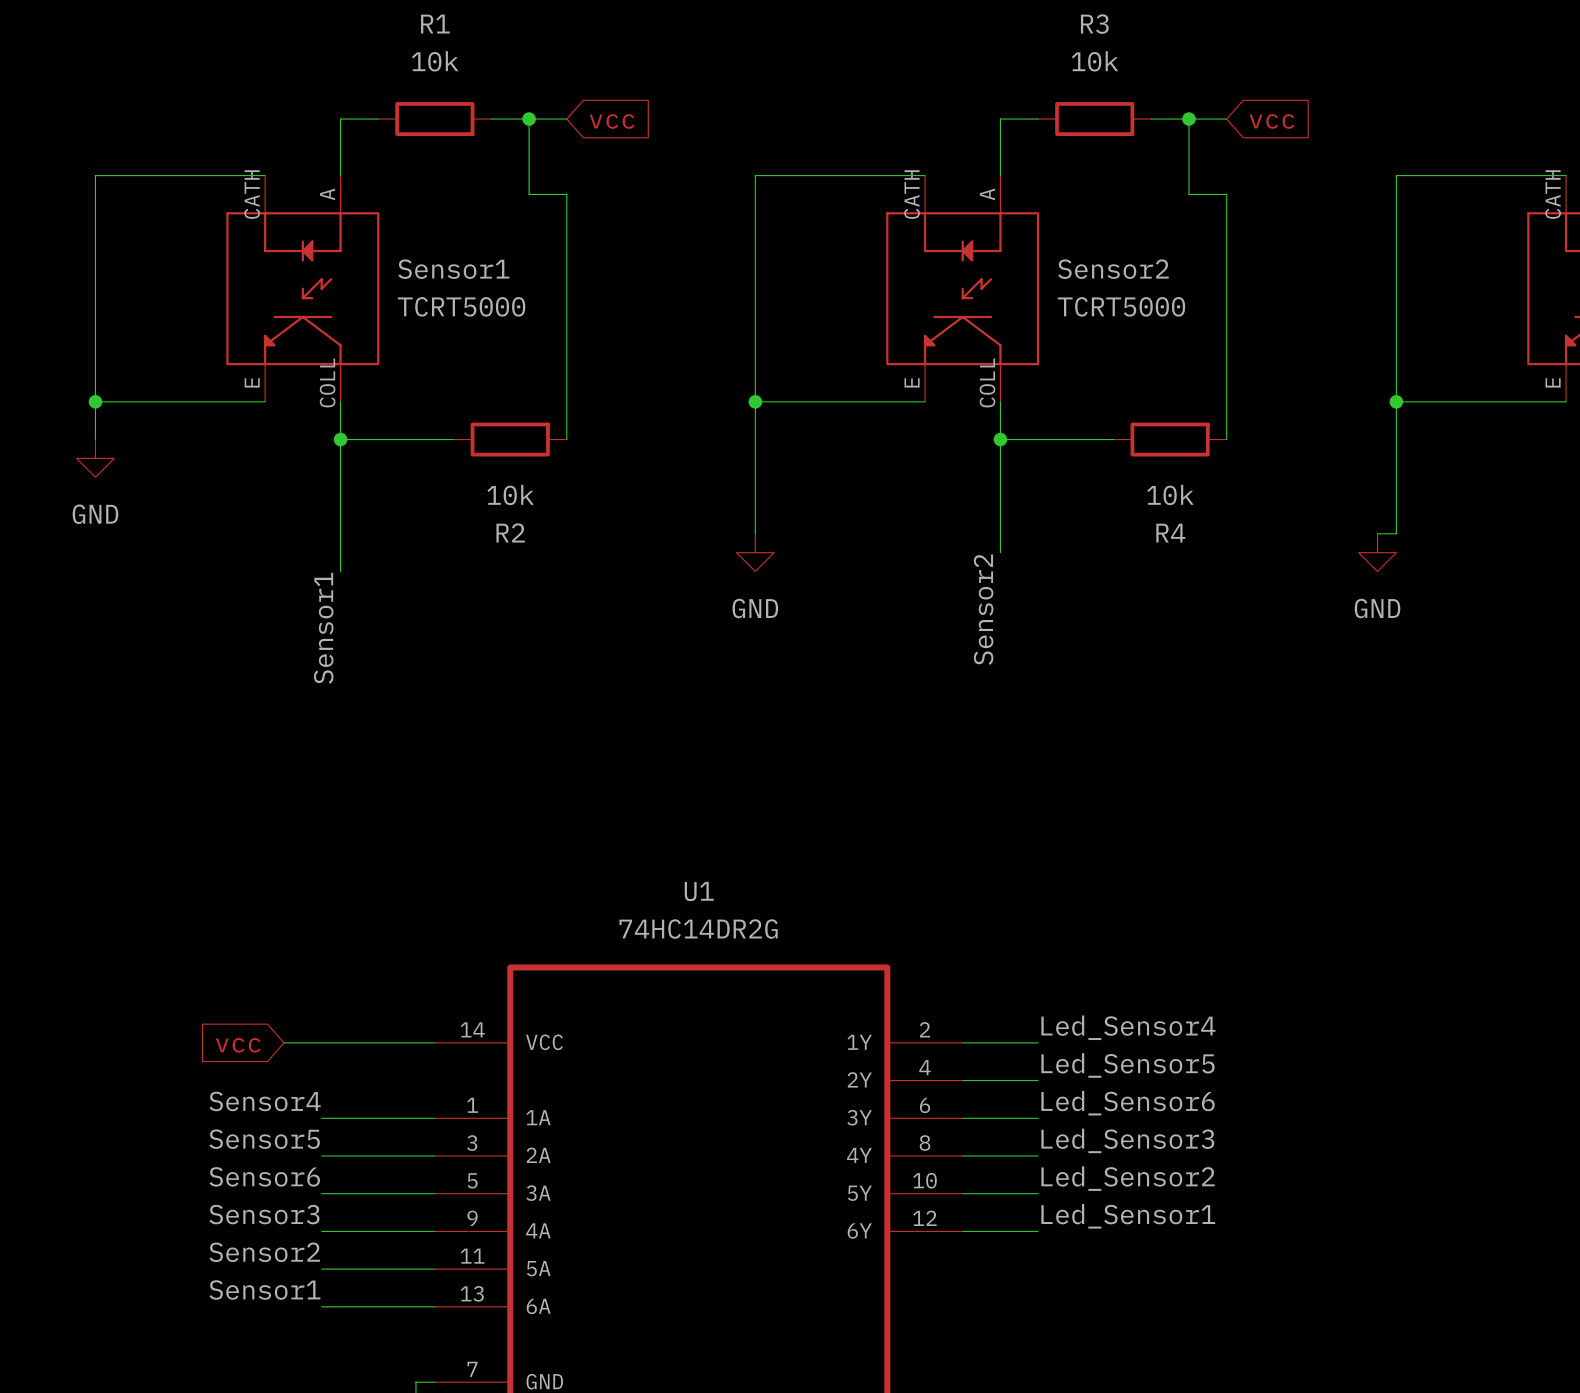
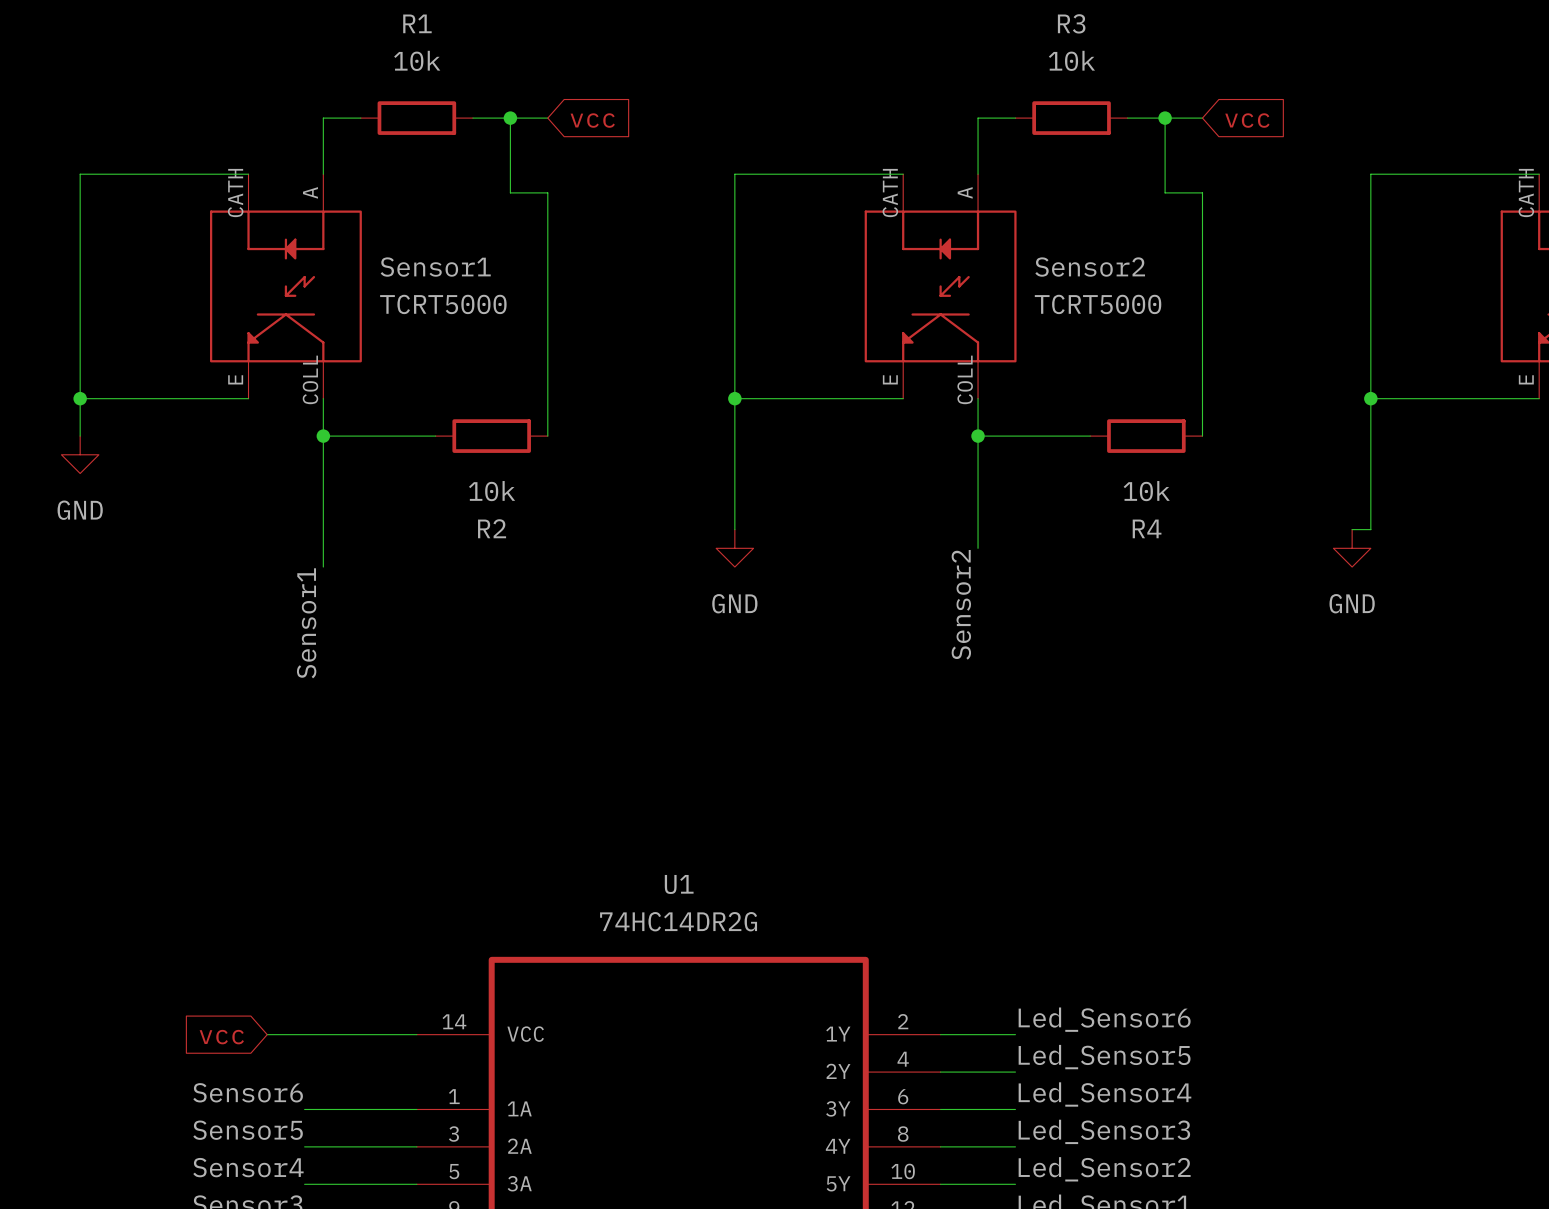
label: Led_Sensor4 (1128, 1027) -> Led_Sensor6 (1104, 1019)
label: Sensor4 (265, 1101) -> Sensor6 (248, 1092)
label: Led_Sensor6 (1128, 1103) -> Led_Sensor4 (1104, 1094)
label: Sensor6 (264, 1176) -> Sensor4 (248, 1167)

